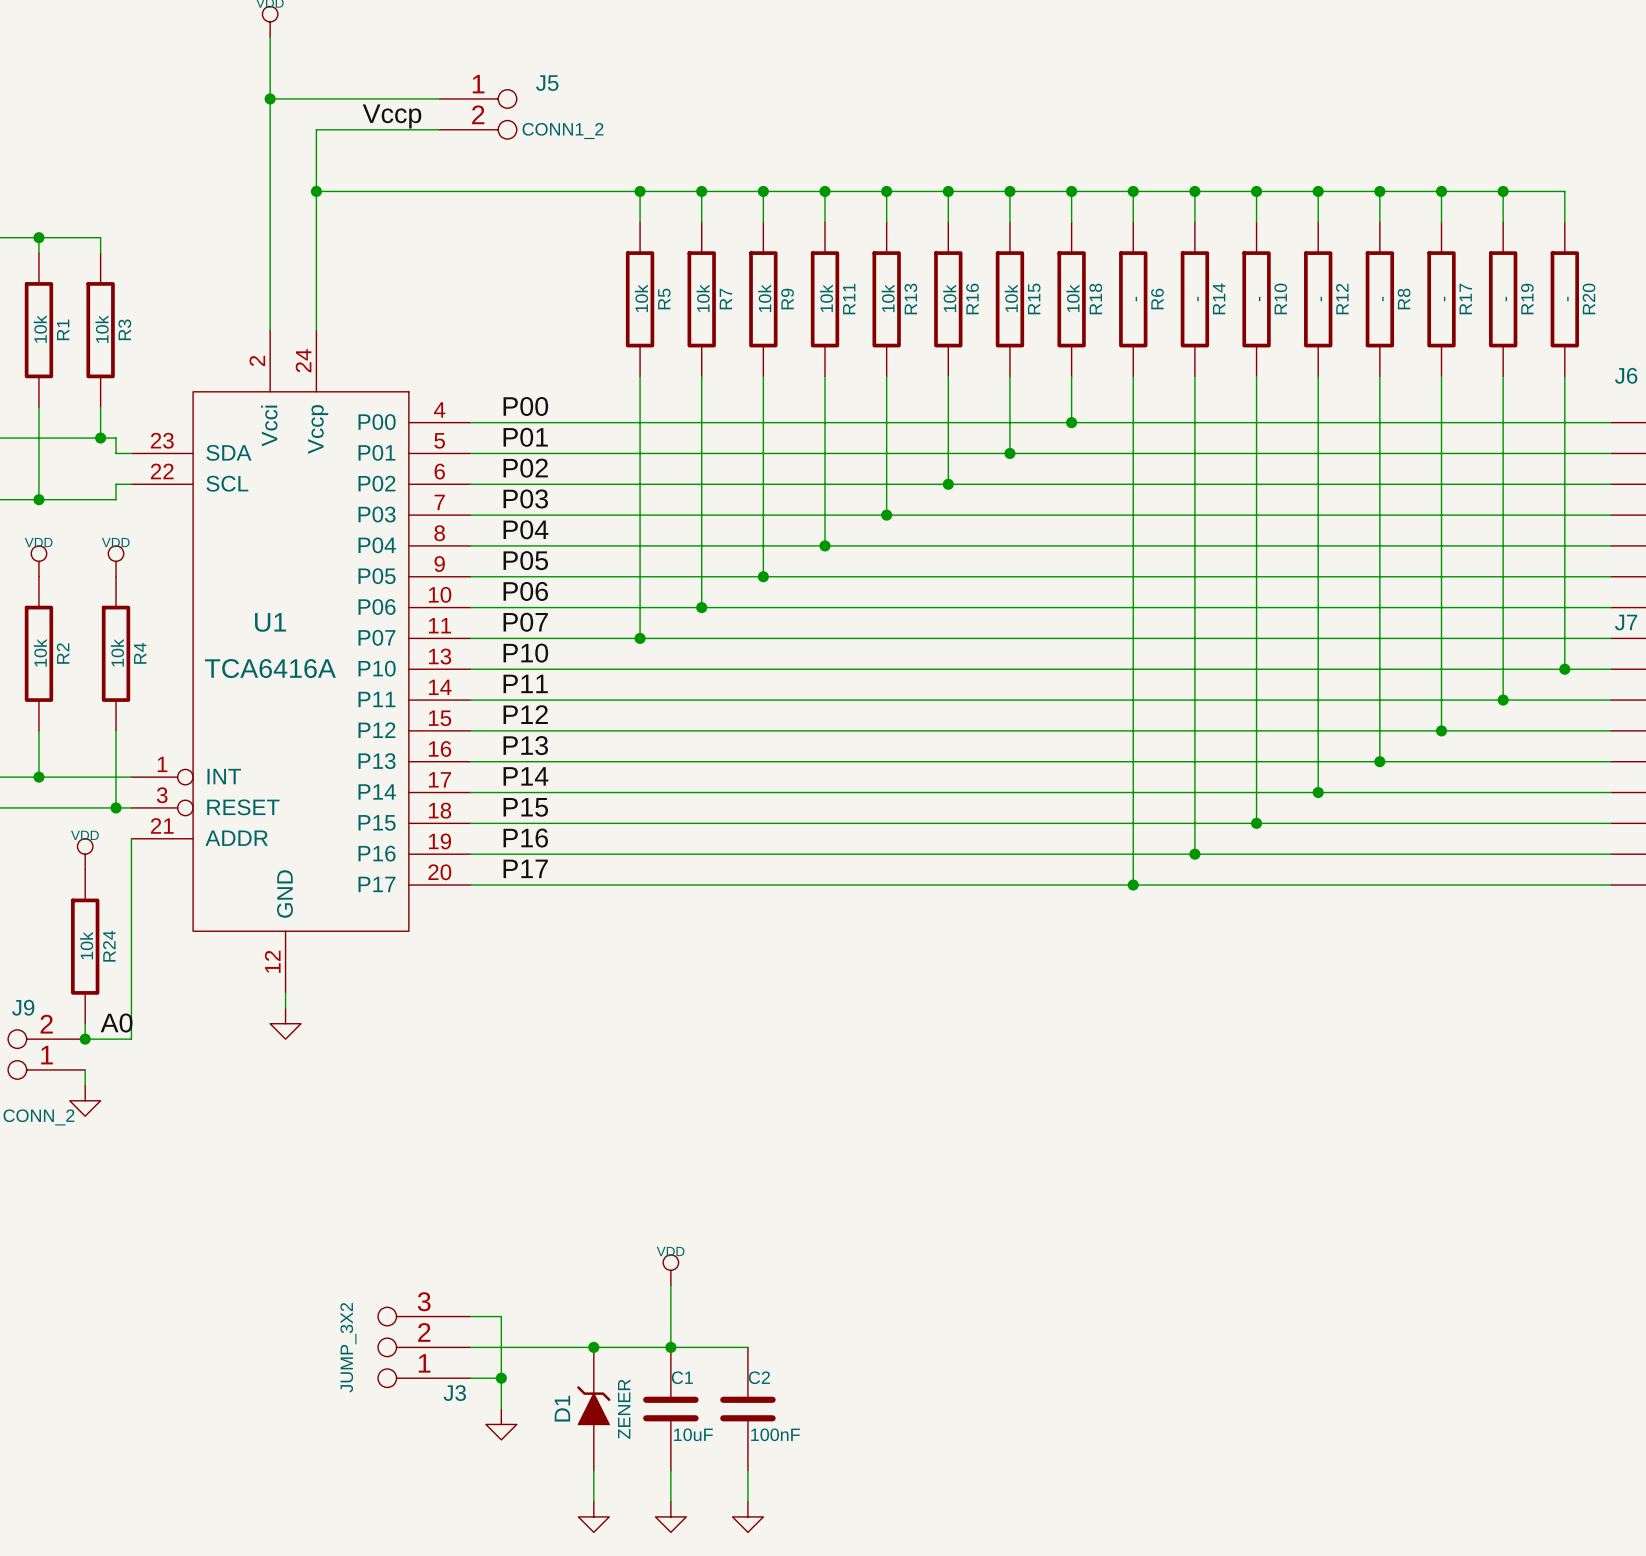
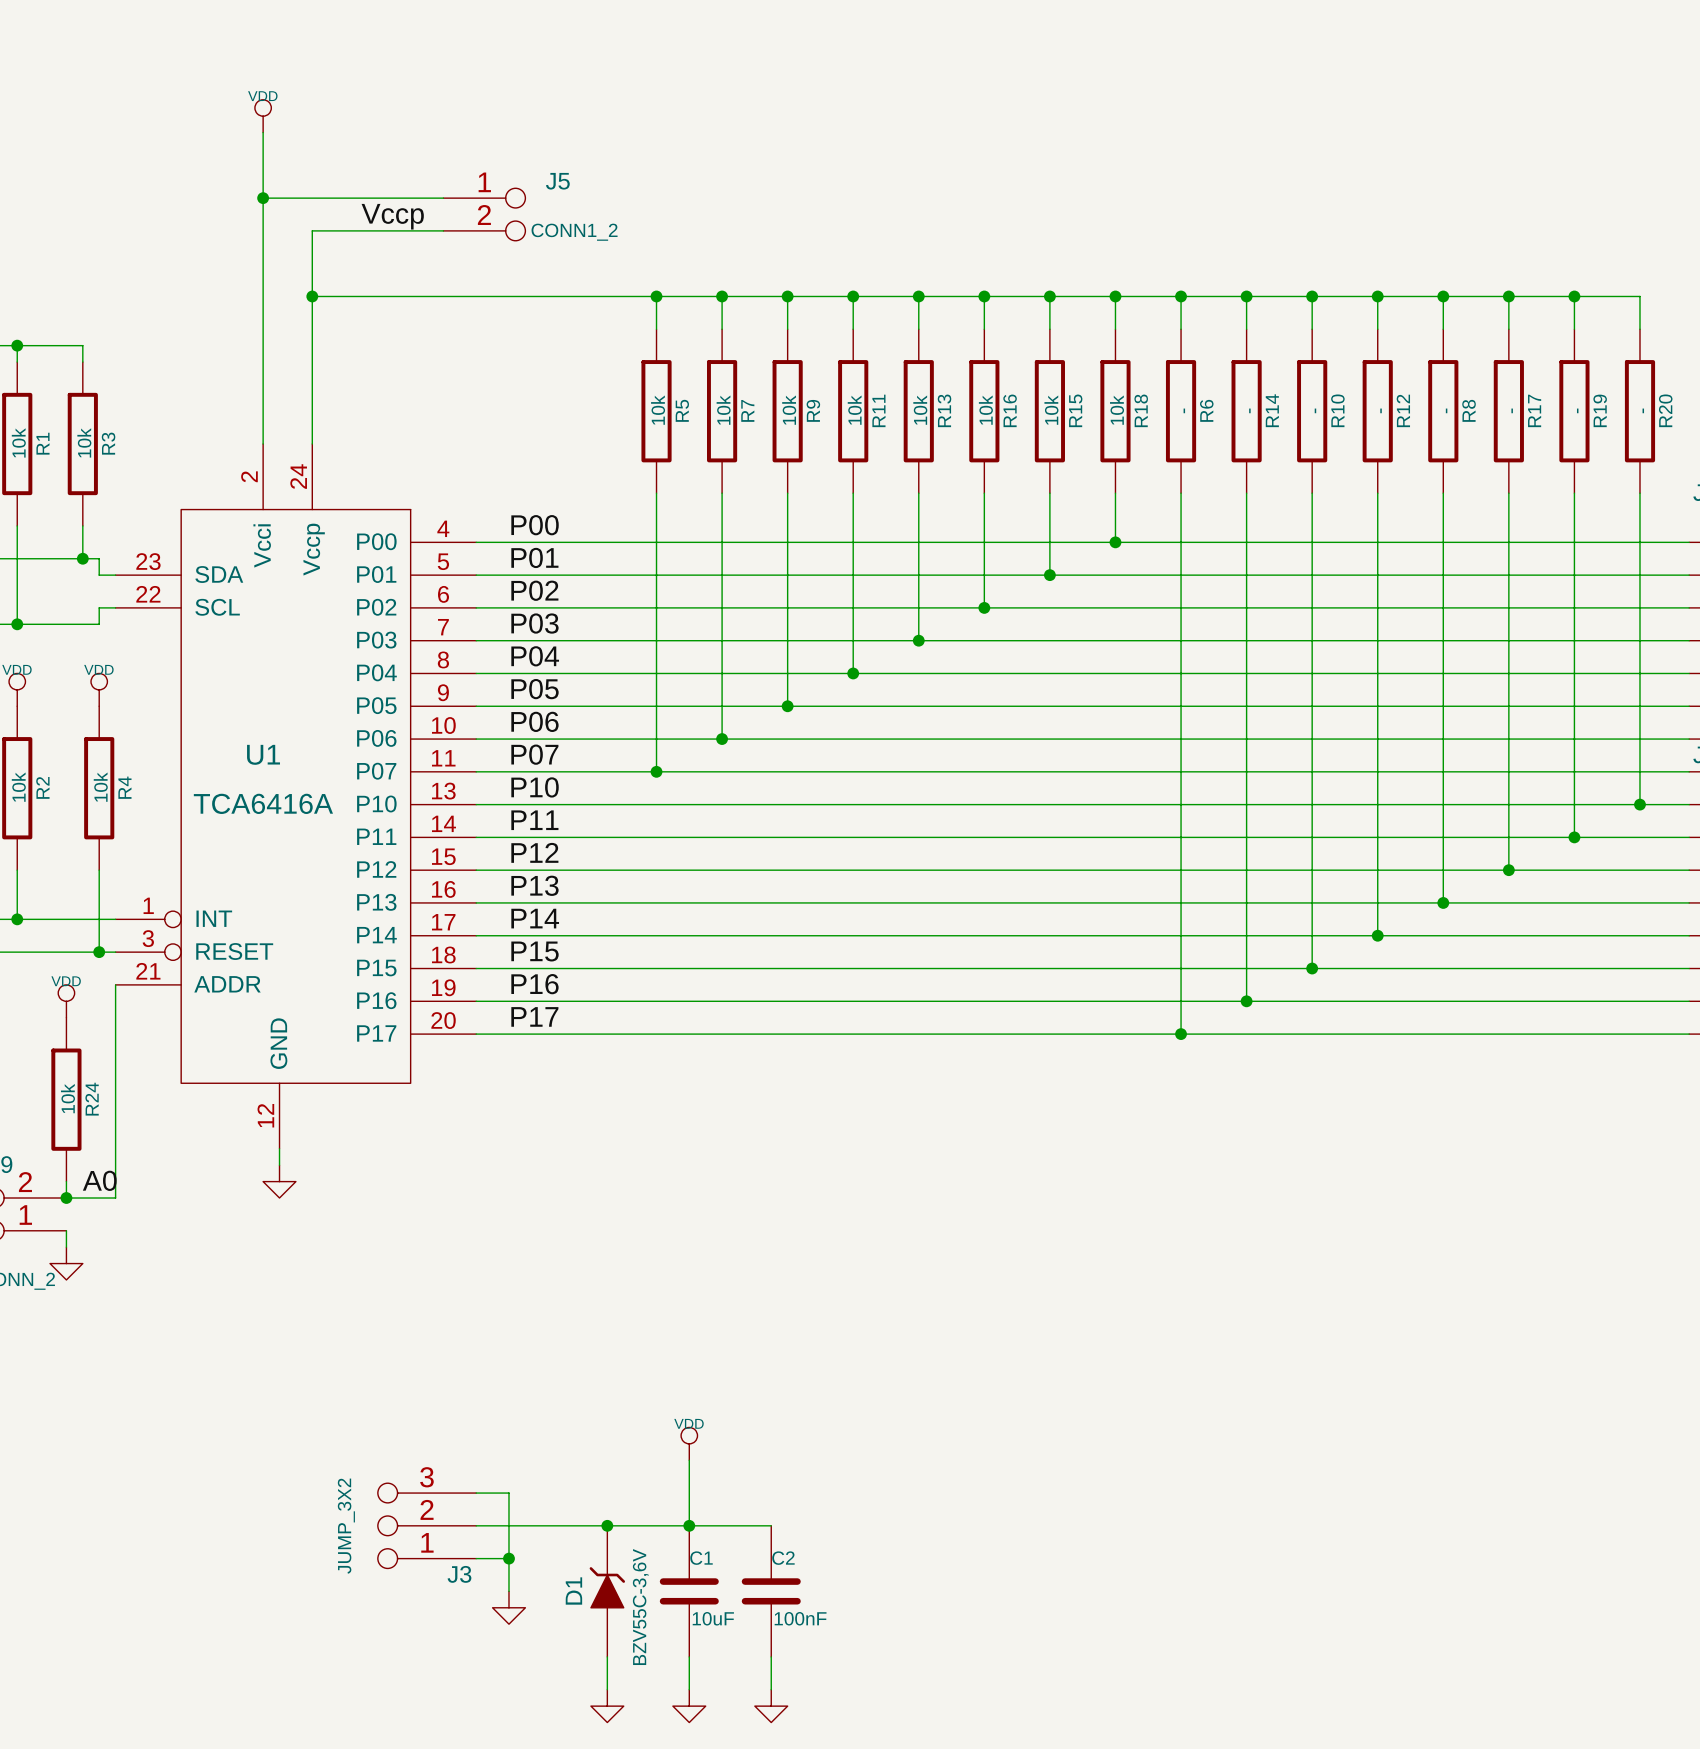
D1 value: ZENER (624, 1409) -> BZV55C-3,6V (640, 1607)

